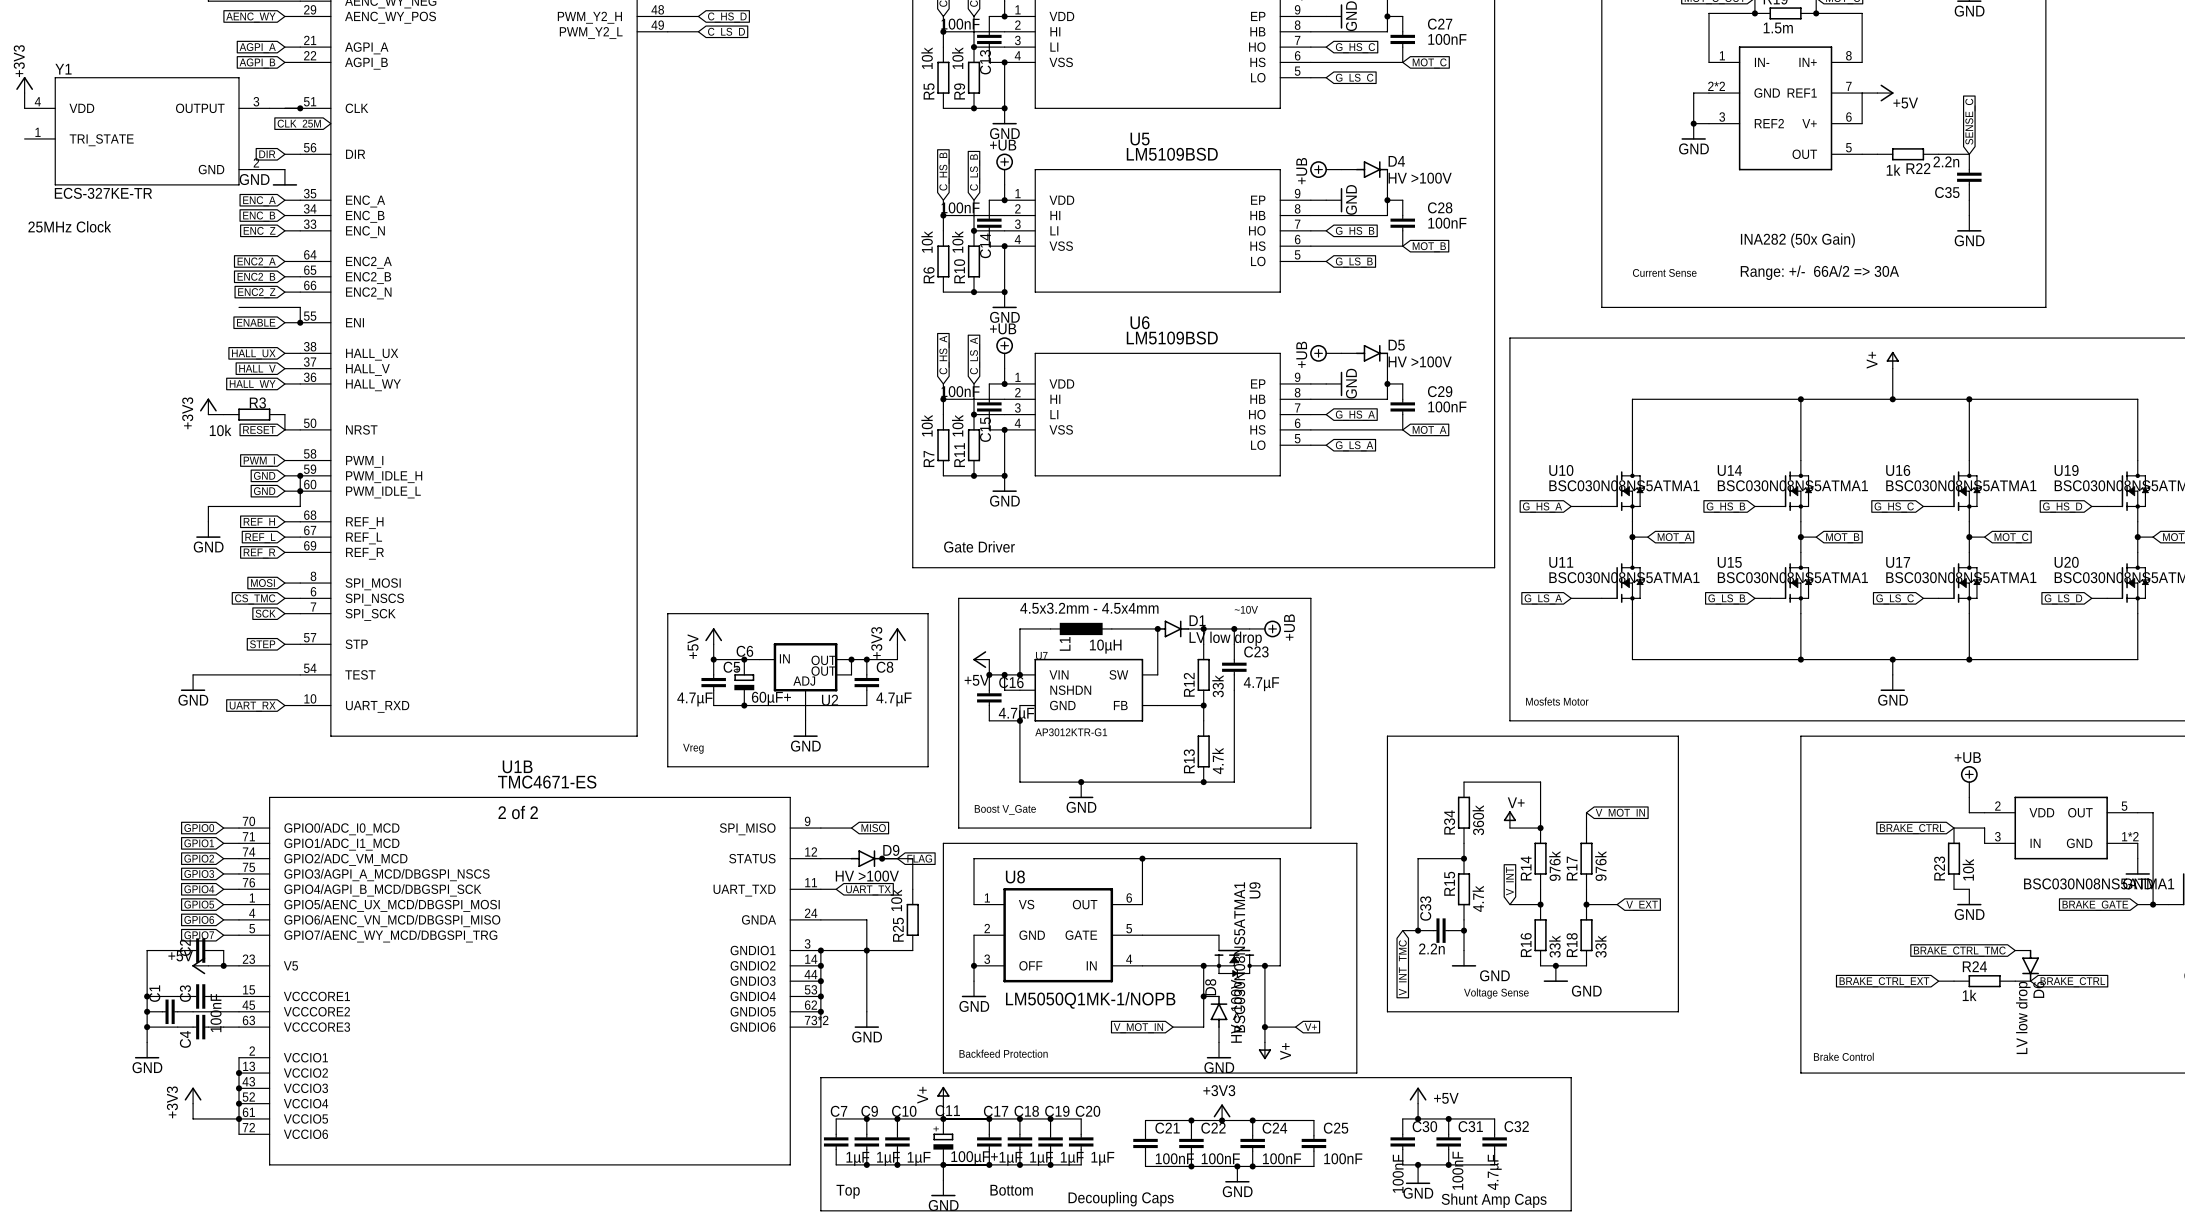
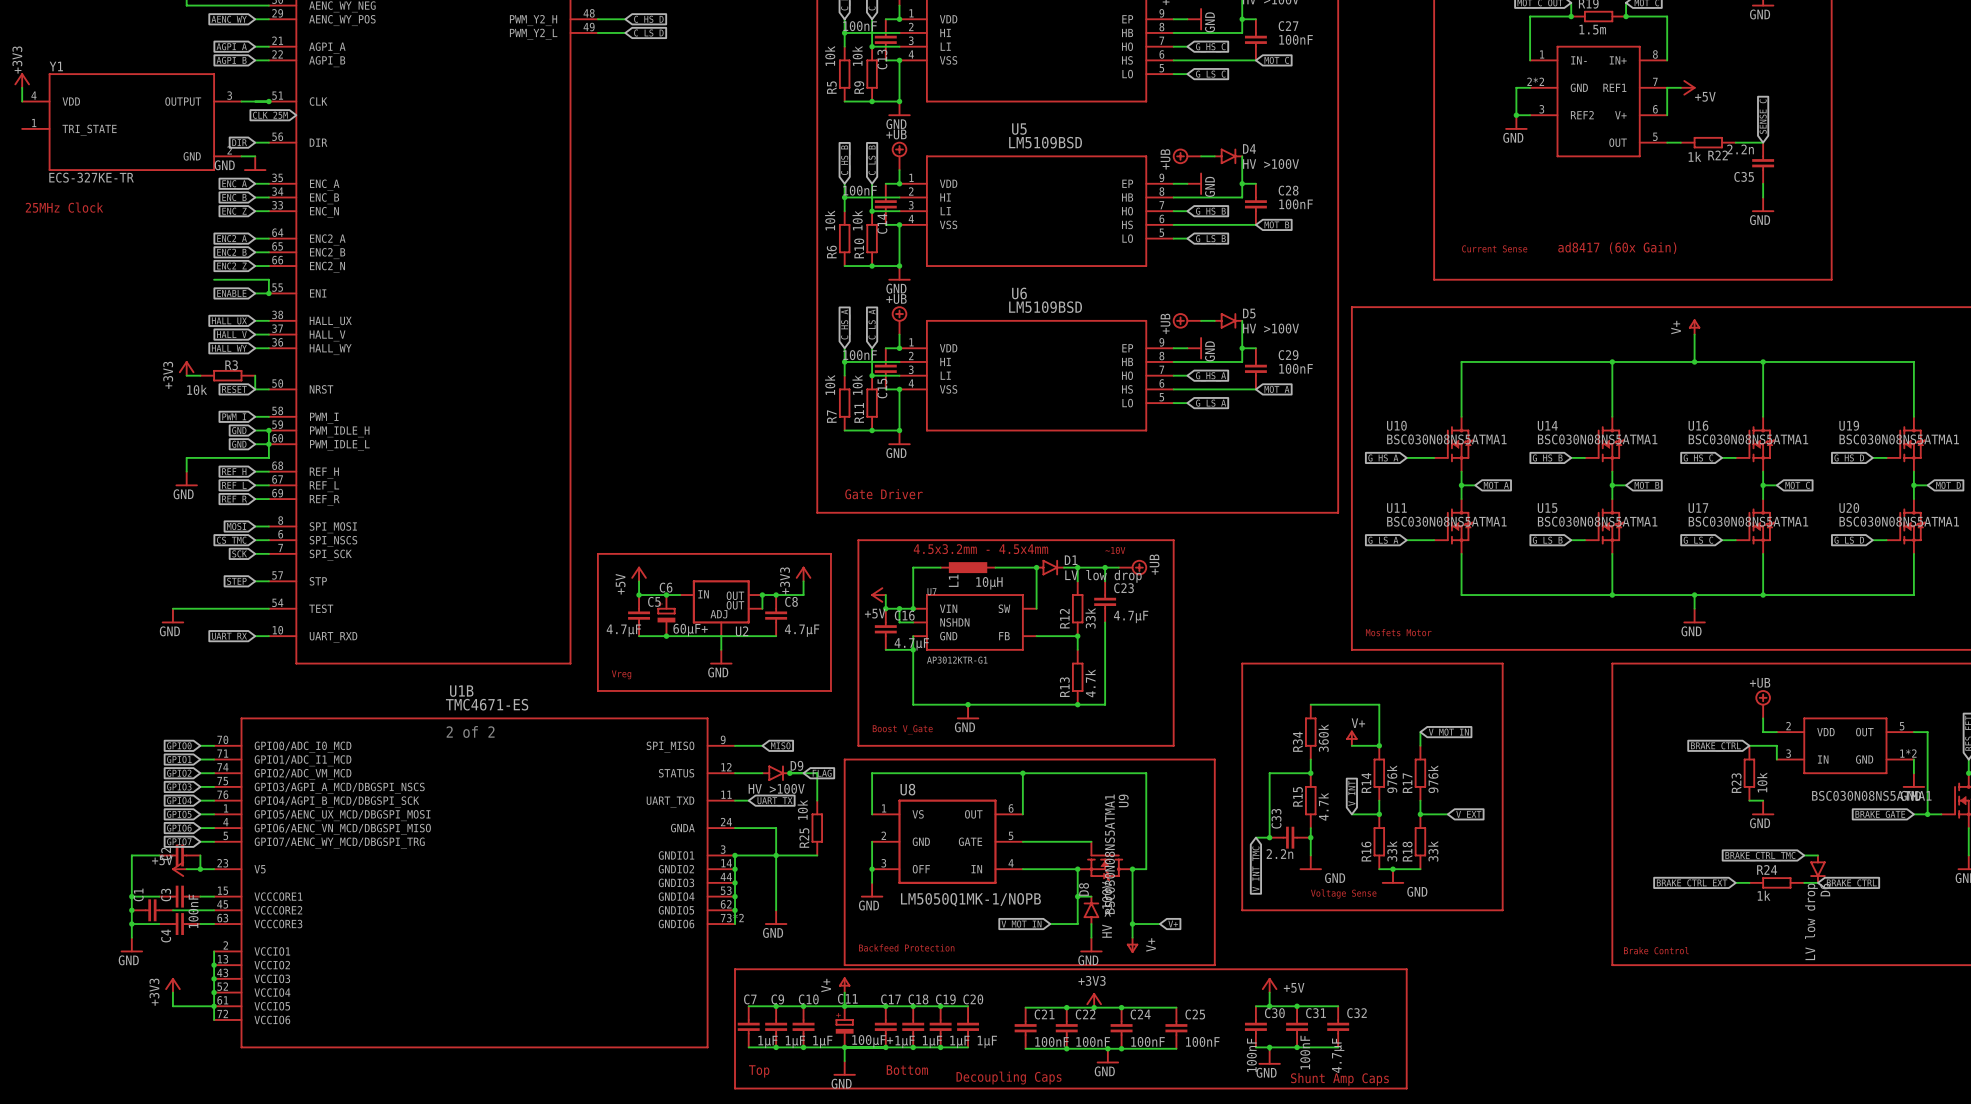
text: INA282 (50x Gain) (1797, 240) -> none
text: Range: +/- 66A/2 => 30A (1819, 272) -> ad8417 (60x Gain) (1617, 248)

